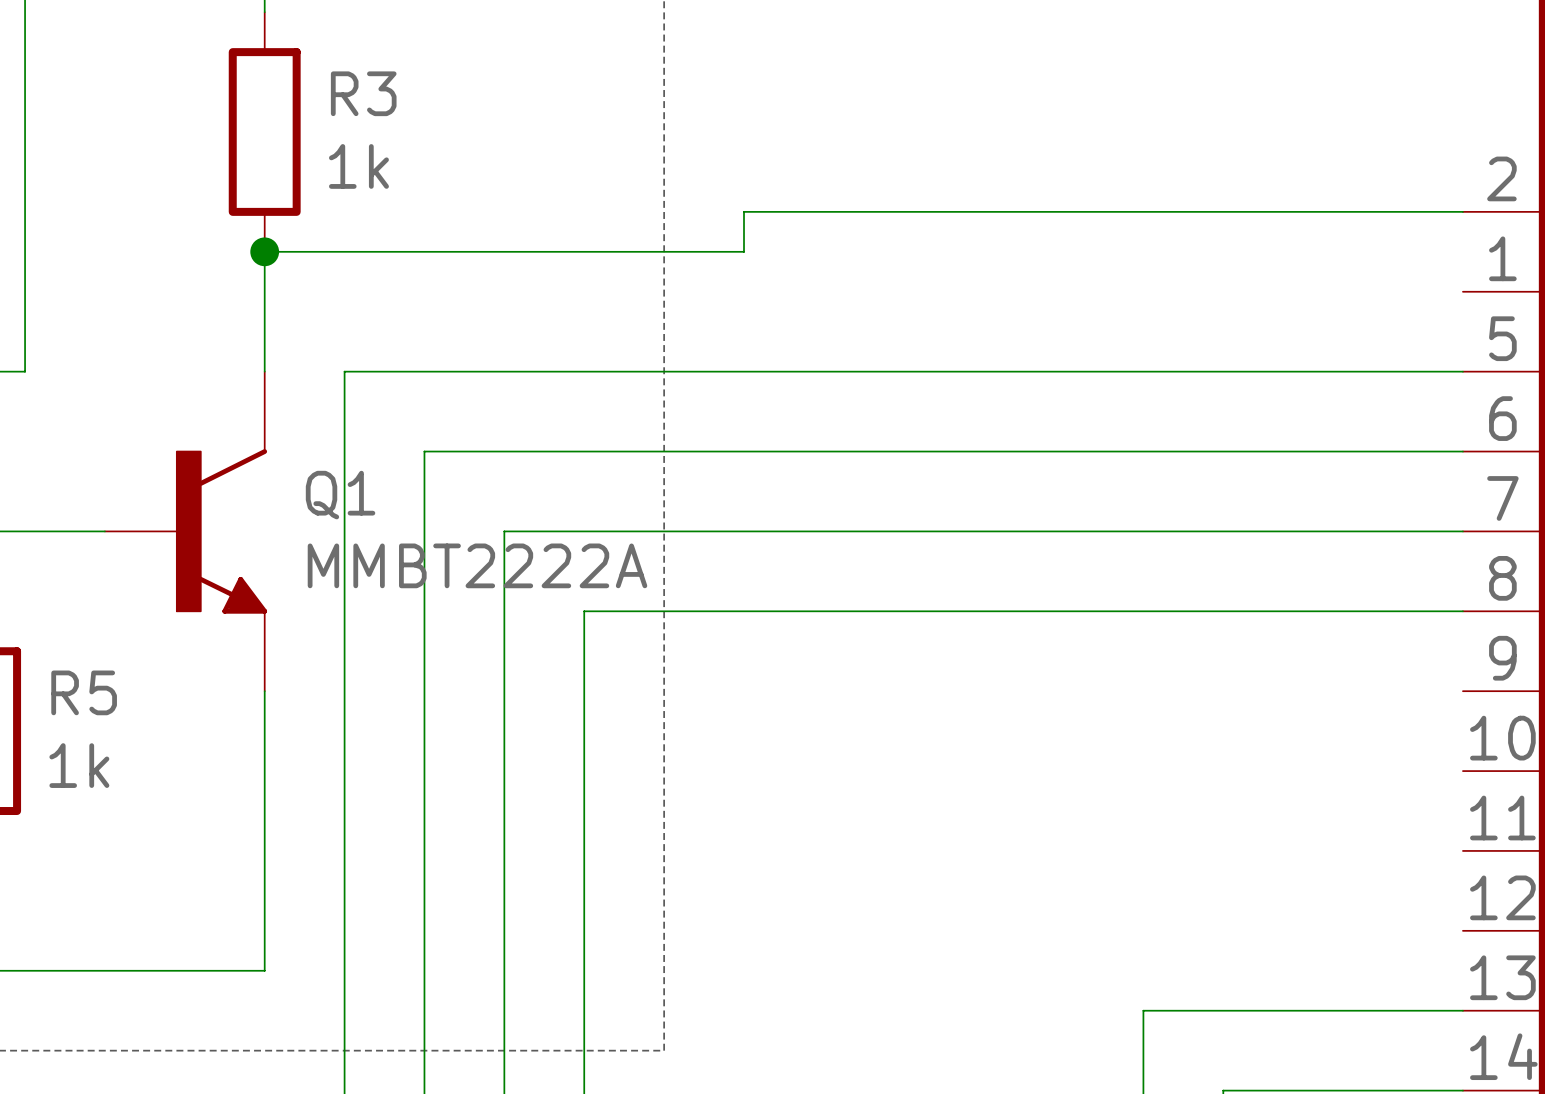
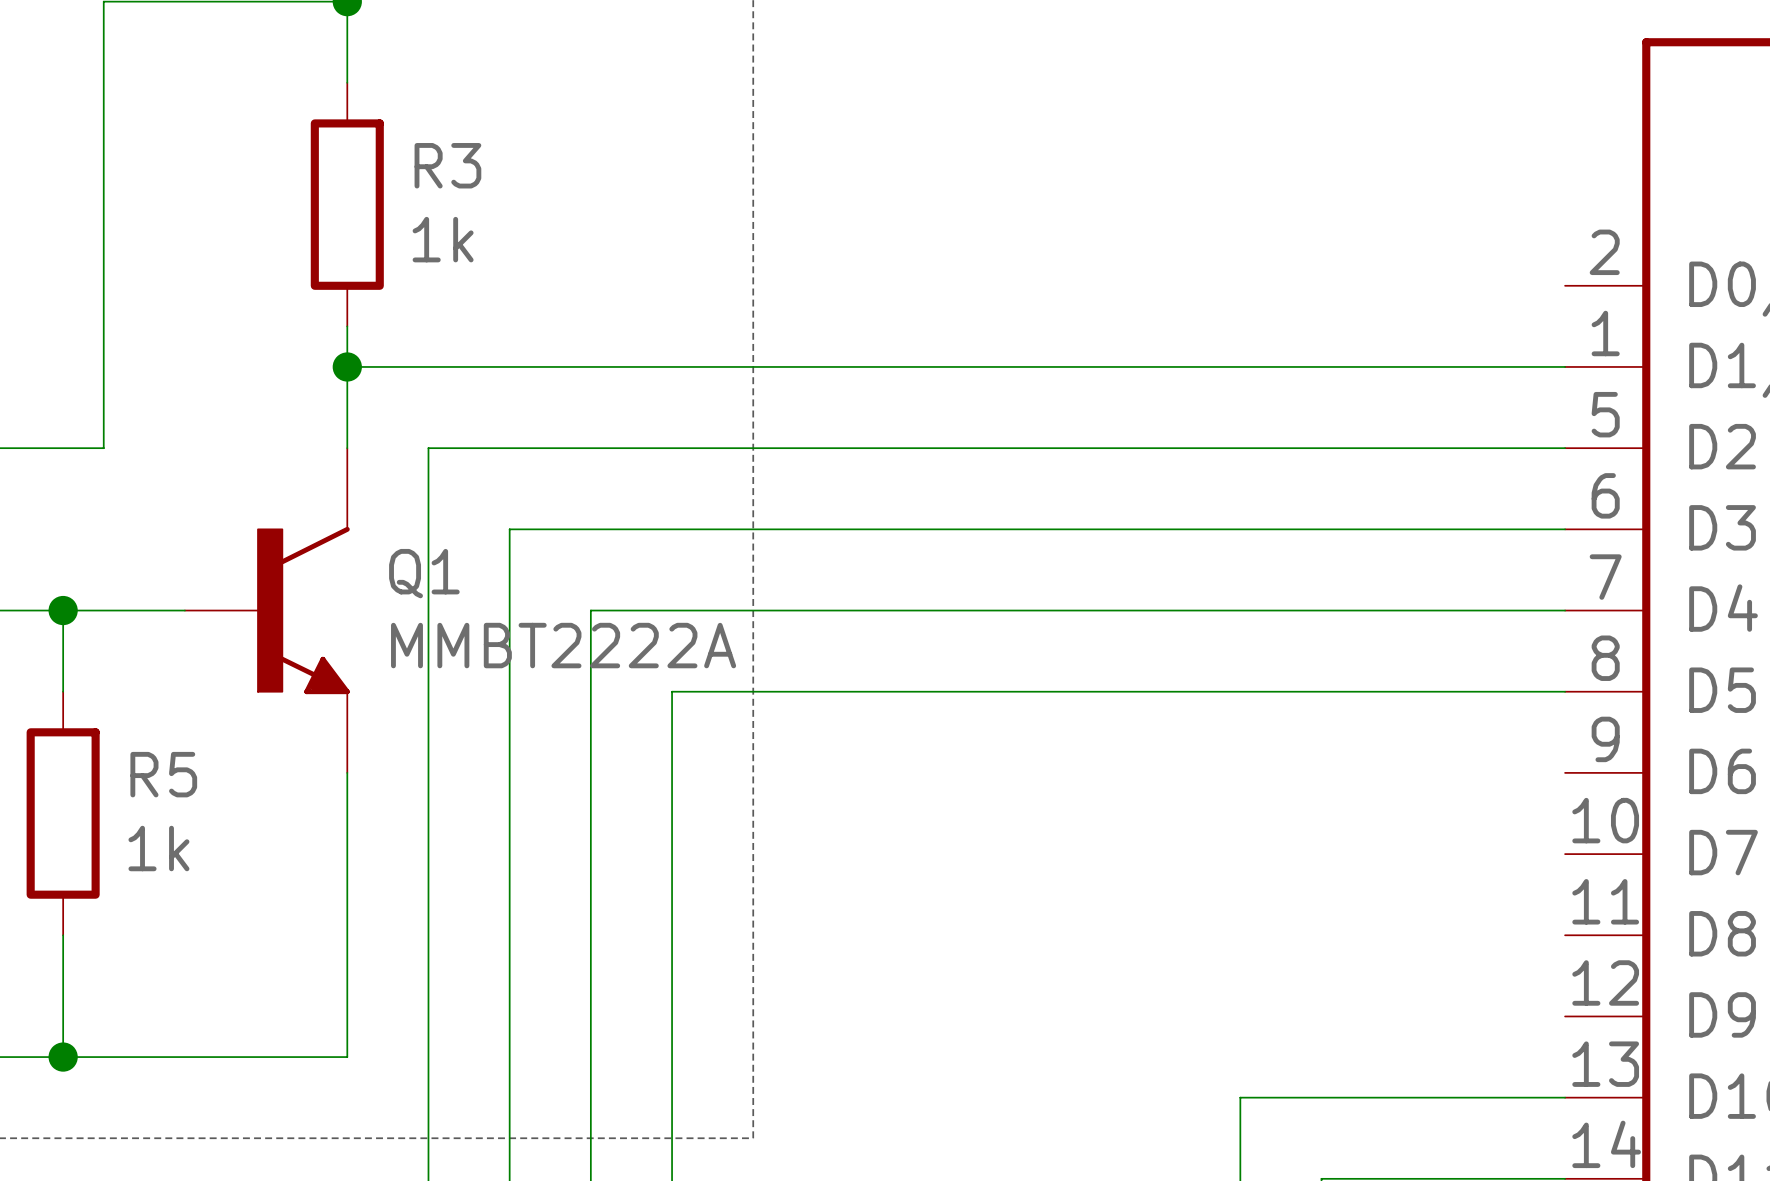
wire: (1462, 211) (744, 211) (744, 251) (264, 251) -> none
junction position: (264, 251) -> (347, 366)
wire: none -> (347, 366) (1565, 366)

